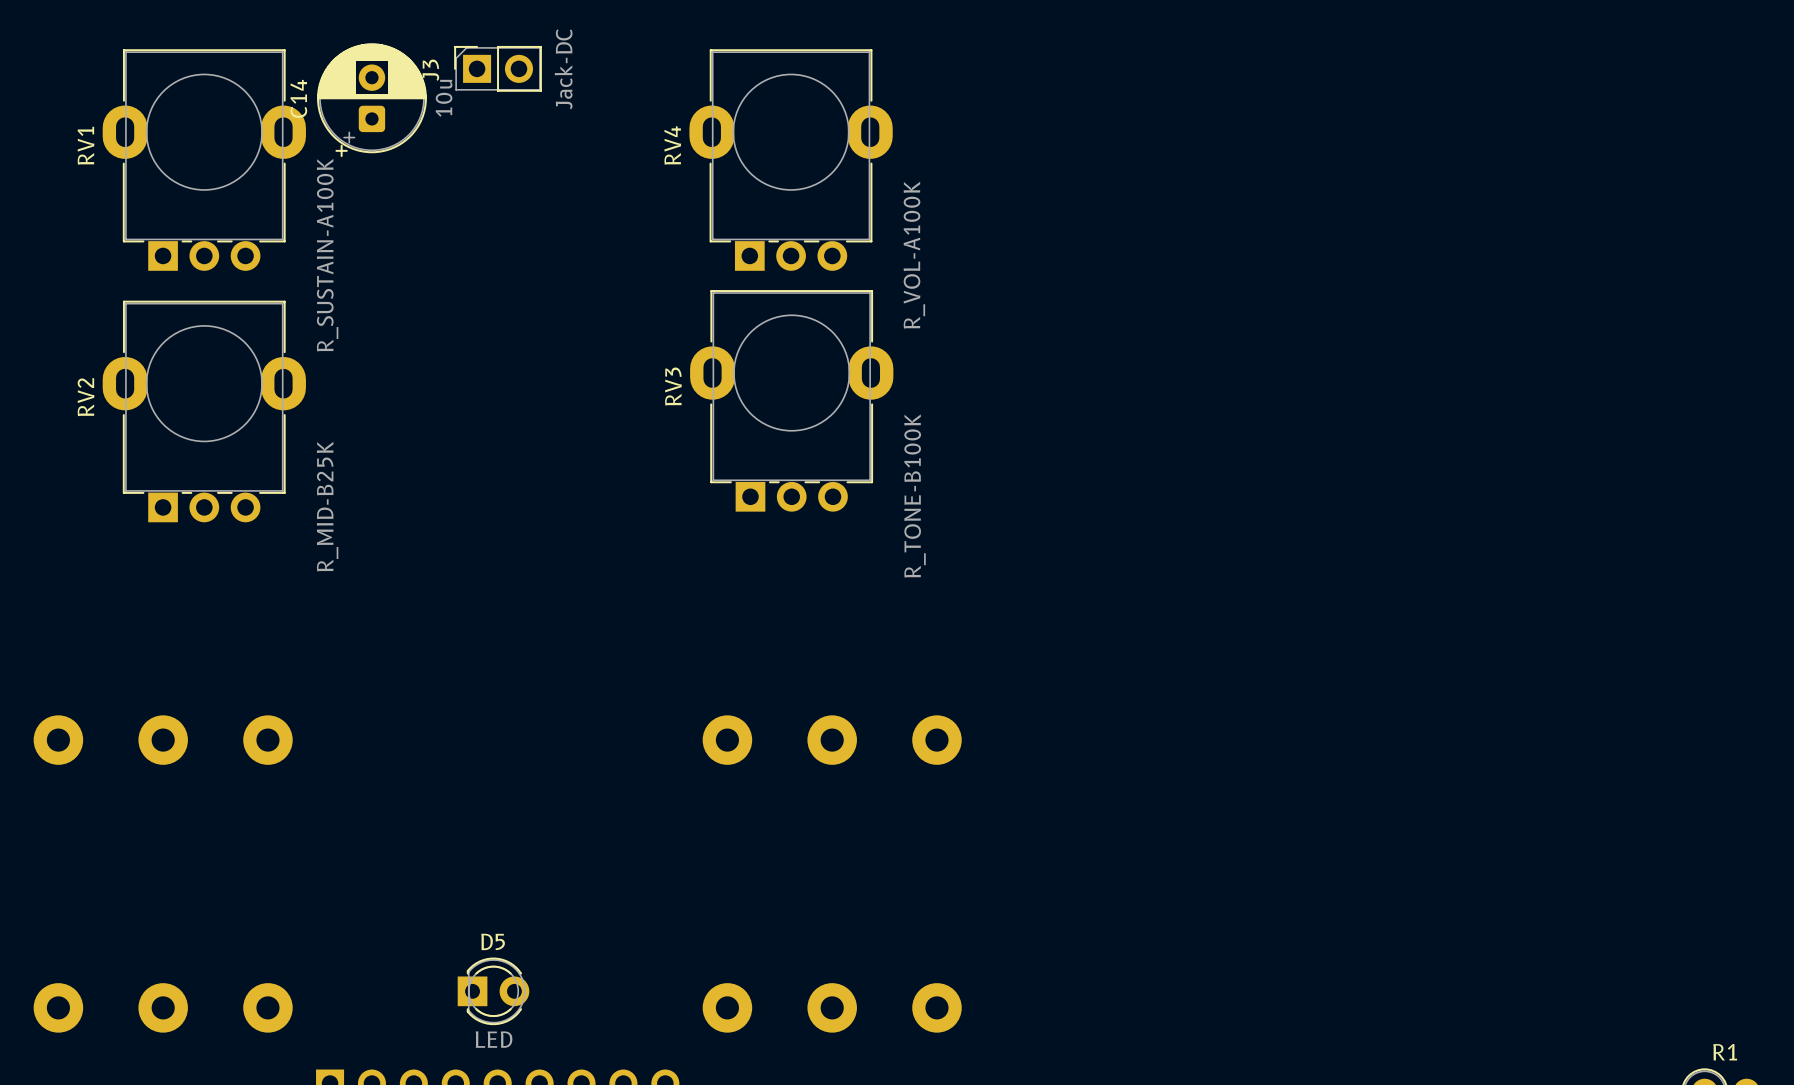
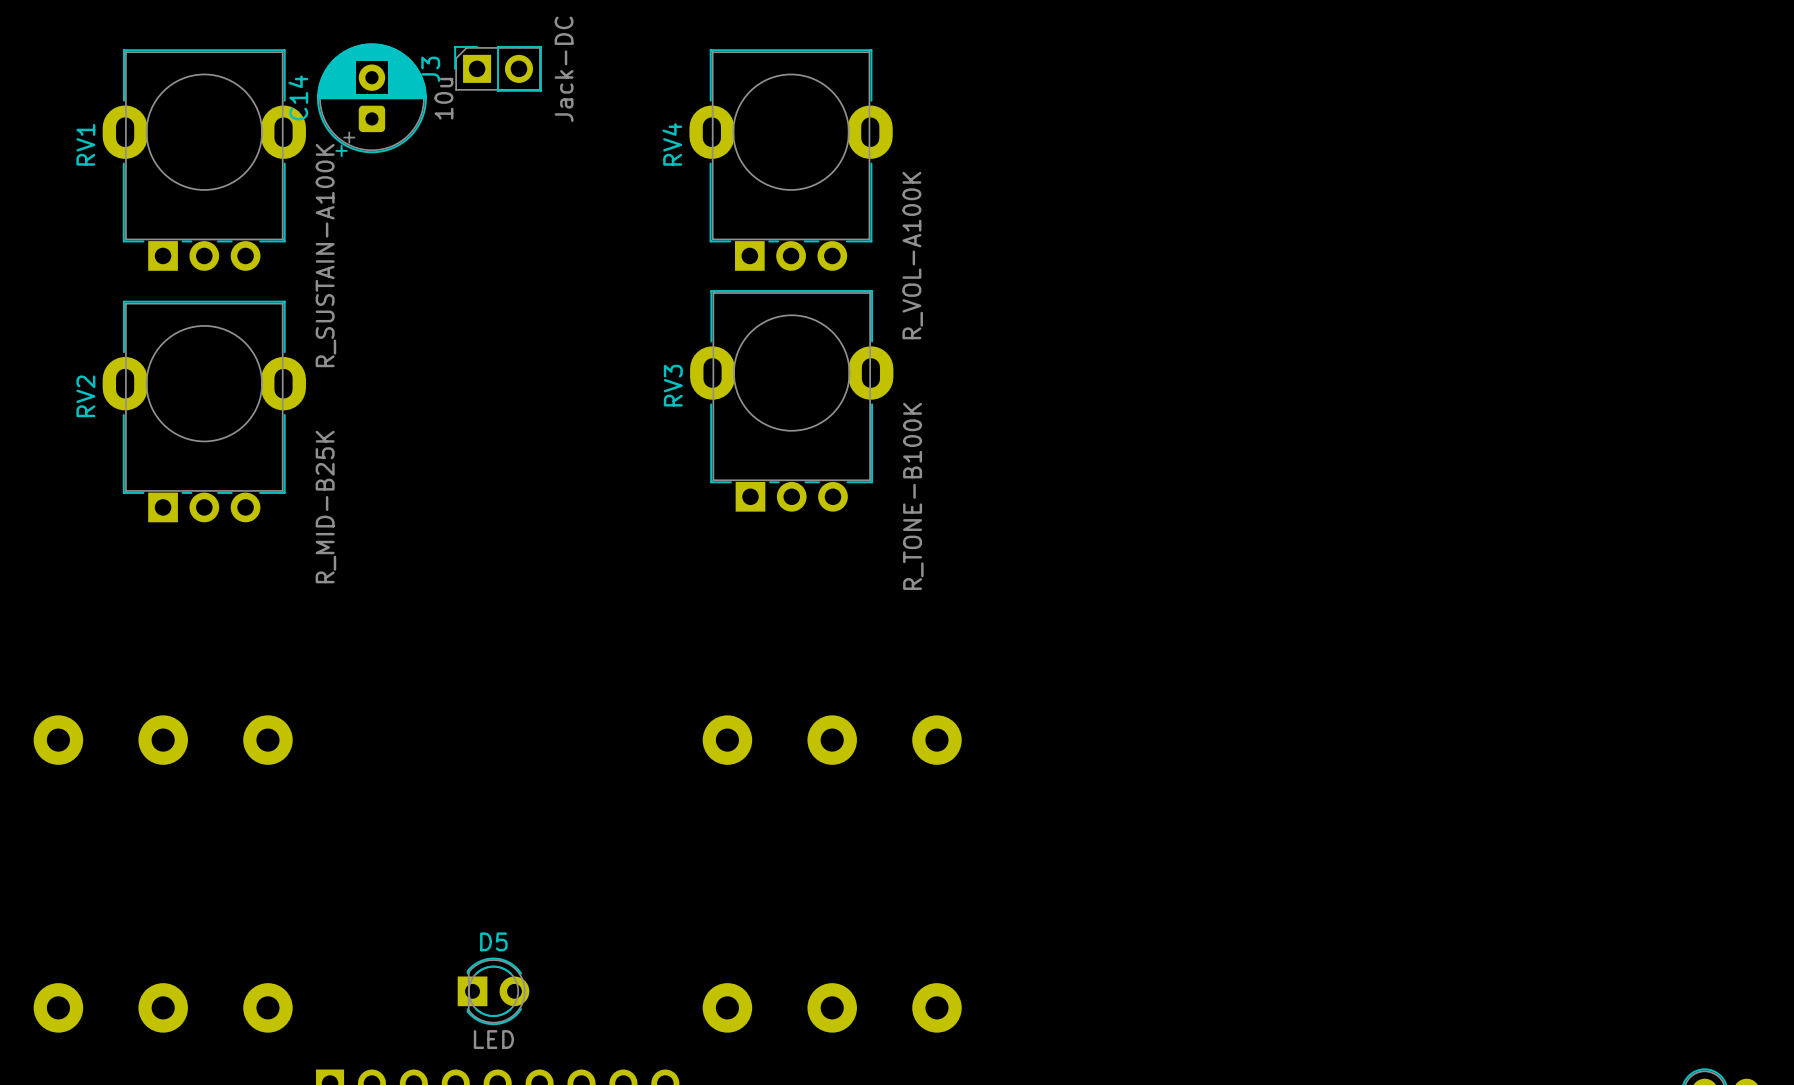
R1 name: R1 (1725, 1052) -> none

